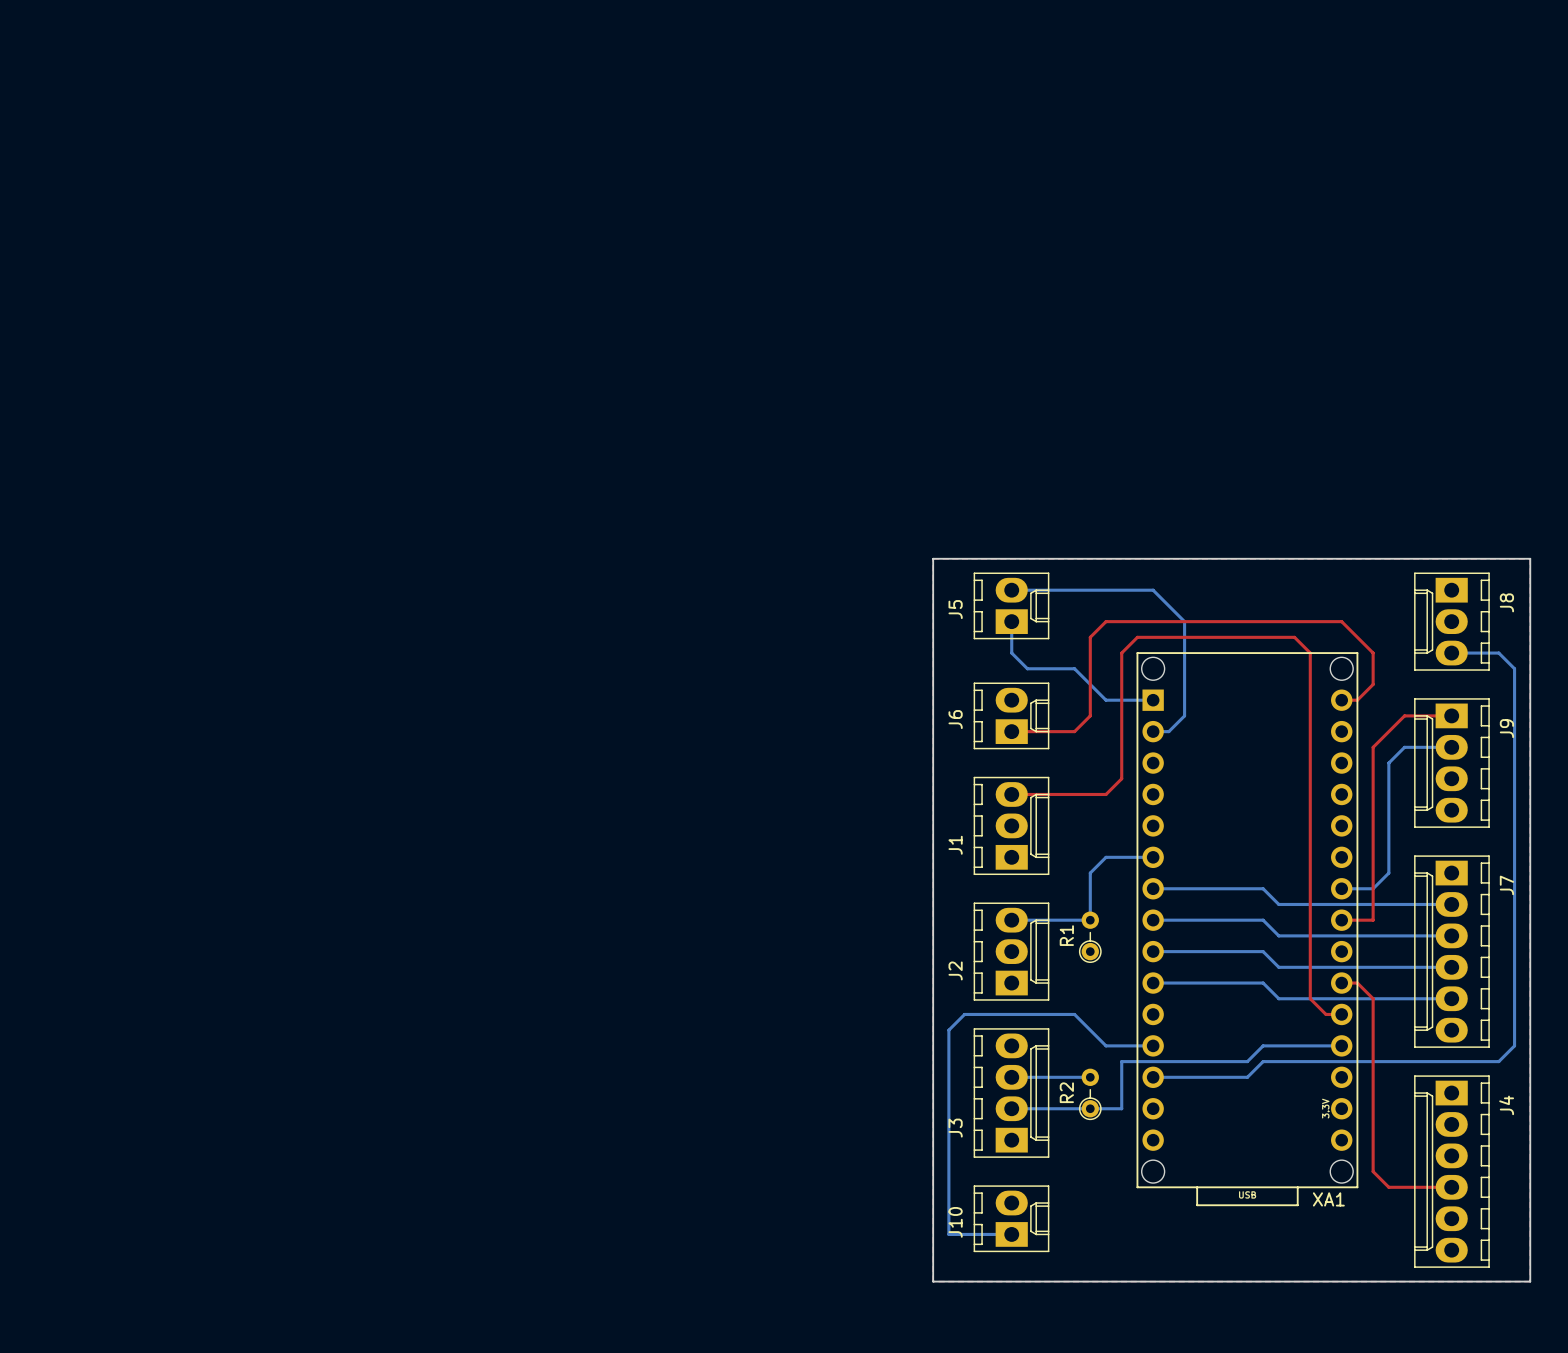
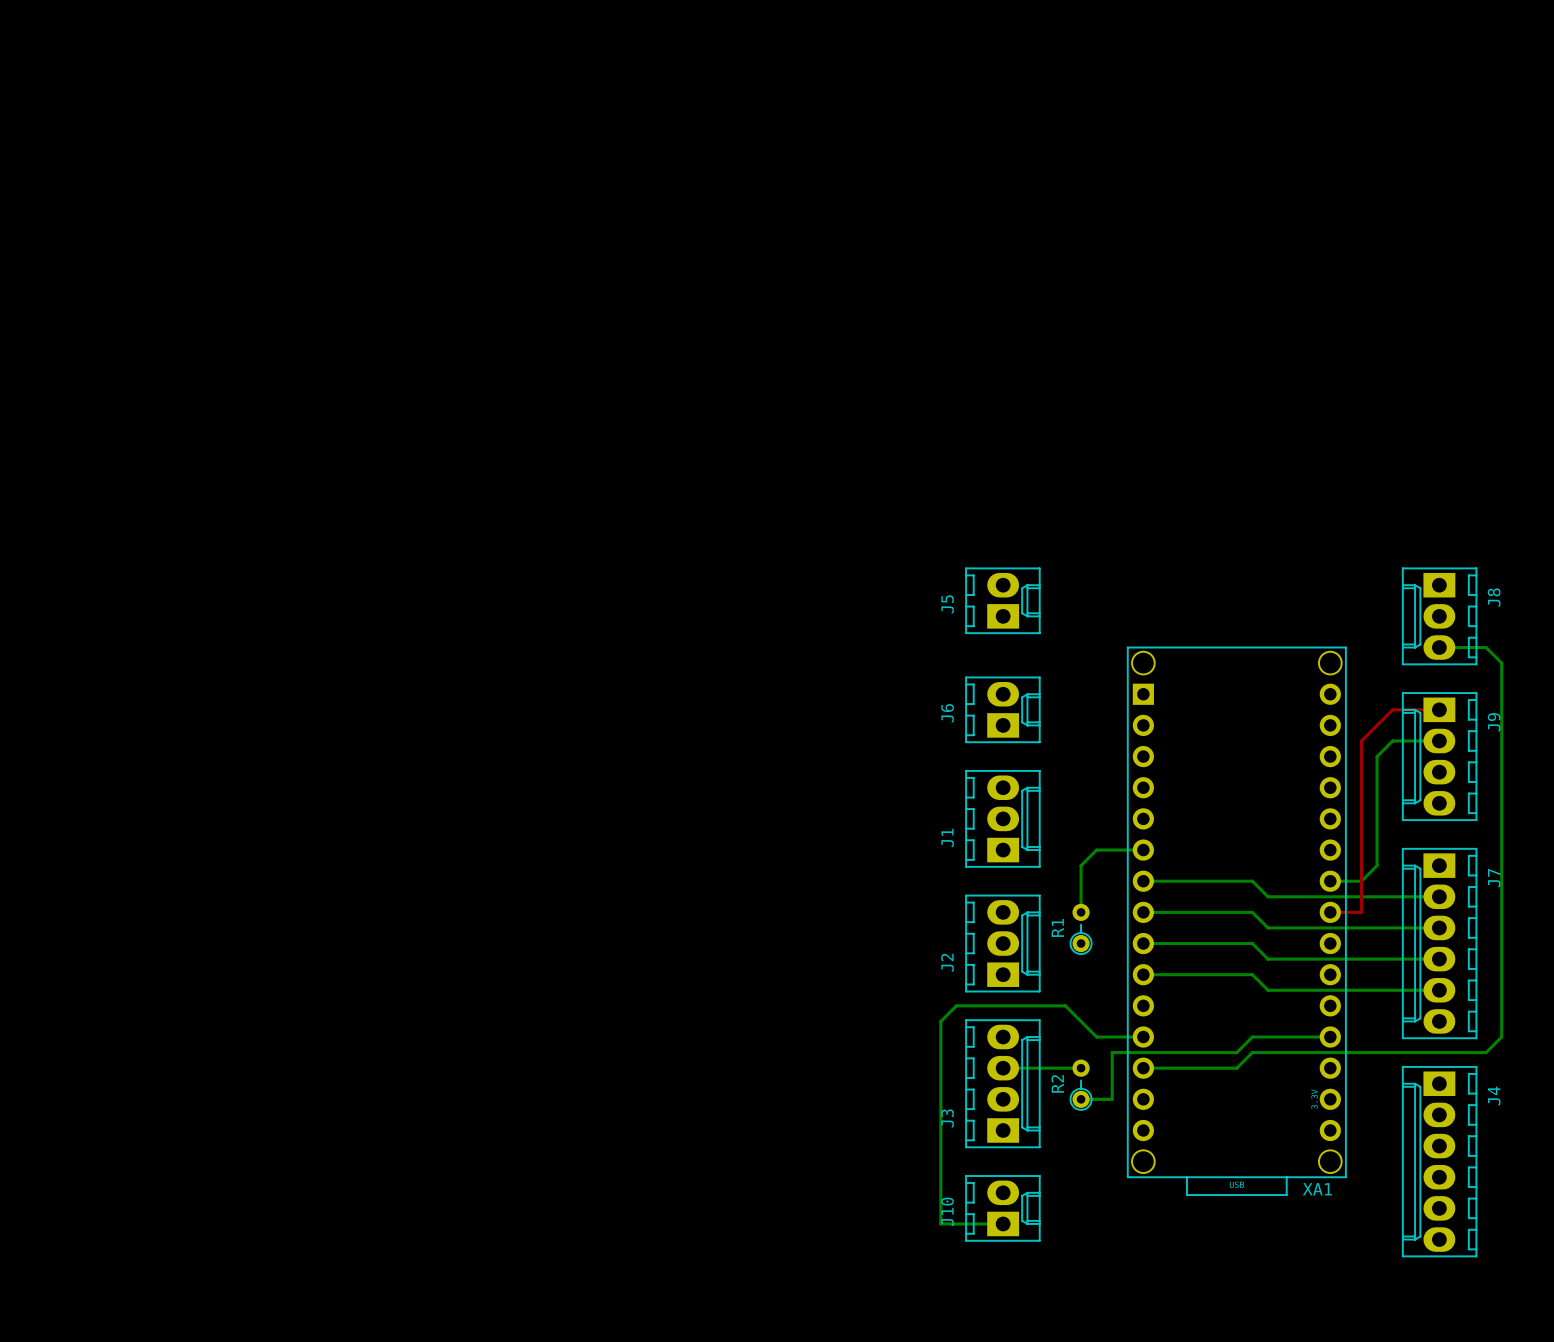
board edge: (933, 558) (933, 1281) (1530, 1281) (1530, 558) (933, 558) -> none
bottom track: (1011, 590) (1153, 590) (1184, 621) (1184, 715) (1168, 731) (1153, 731) -> none
bottom track: (1011, 621) (1011, 653) (1027, 668) (1074, 668) (1106, 700) (1153, 700) -> none
top track: (1341, 700) (1357, 700) (1373, 684) (1373, 653) (1341, 621) (1106, 621) (1090, 637) (1090, 715) (1074, 731) (1011, 731) -> none
top track: (1011, 794) (1106, 794) (1121, 778) (1121, 653) (1137, 637) (1294, 637) (1310, 653) (1310, 998) (1326, 1014) (1341, 1014) -> none
bottom track: (1011, 920) (1090, 920) -> none
top track: (1341, 983) (1357, 983) (1373, 998) (1373, 1171) (1388, 1187) (1451, 1187) -> none
bottom track: (1011, 1108) (1090, 1108) -> none

